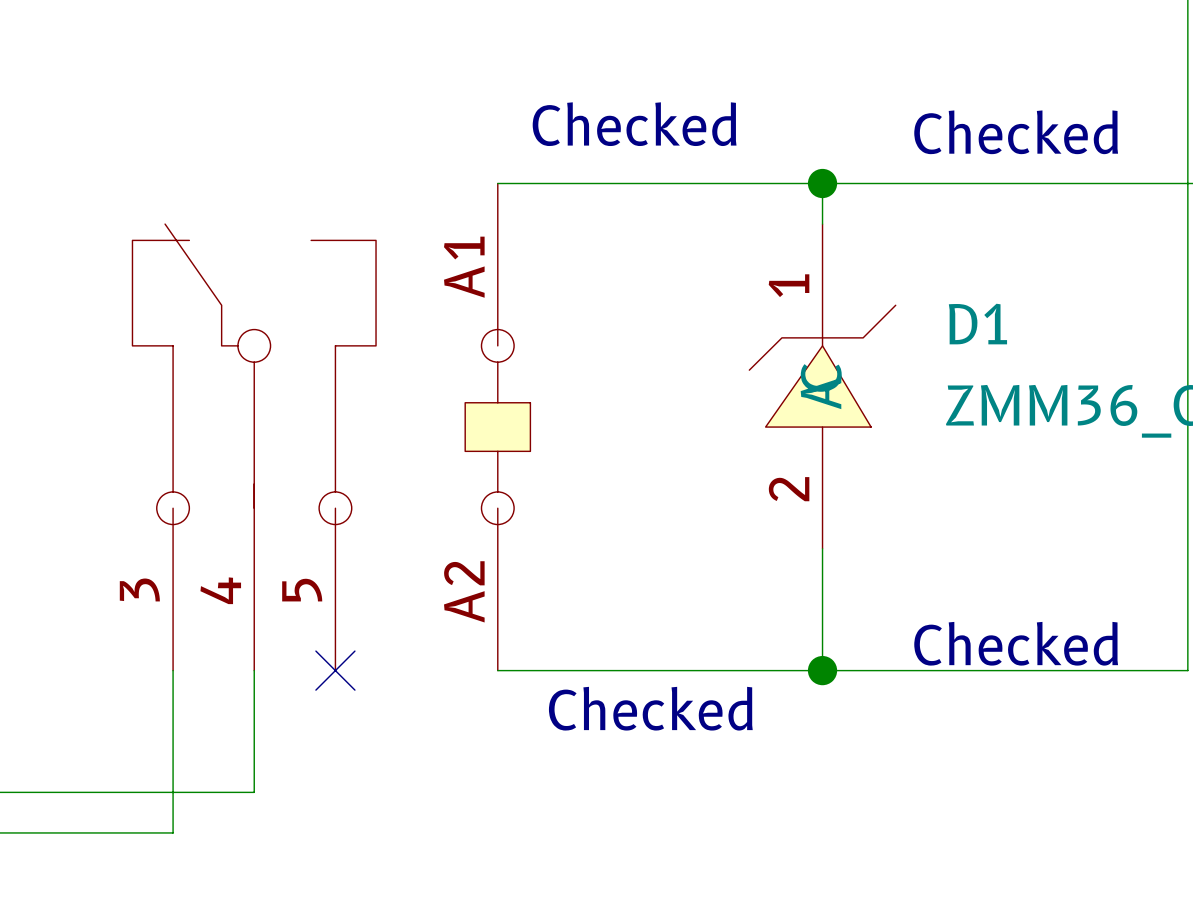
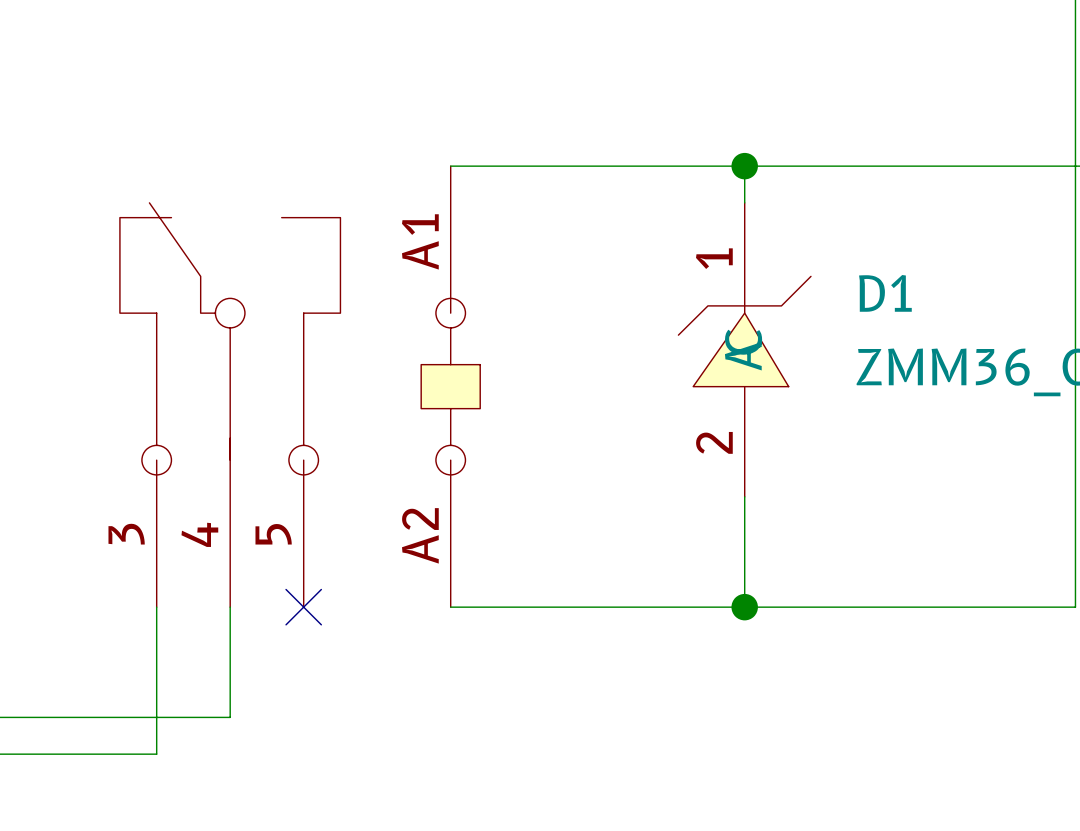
text: Checked (634, 124) -> none
text: Checked (1016, 132) -> none
text: Checked (1016, 643) -> none
text: Checked (650, 708) -> none

